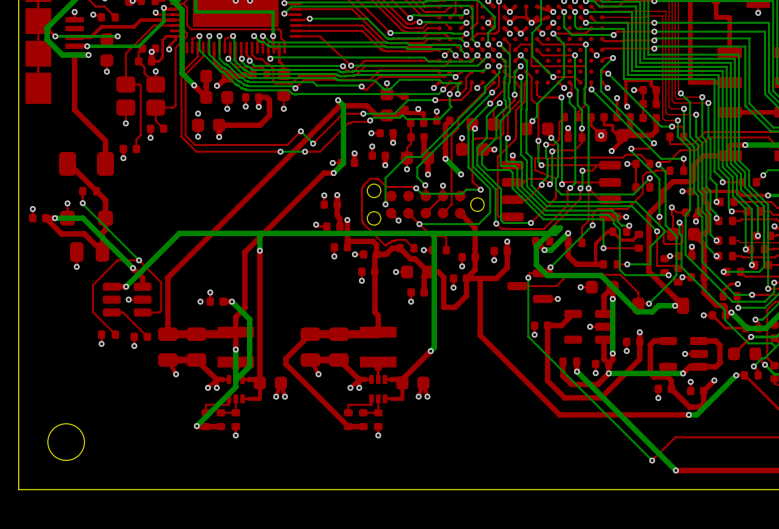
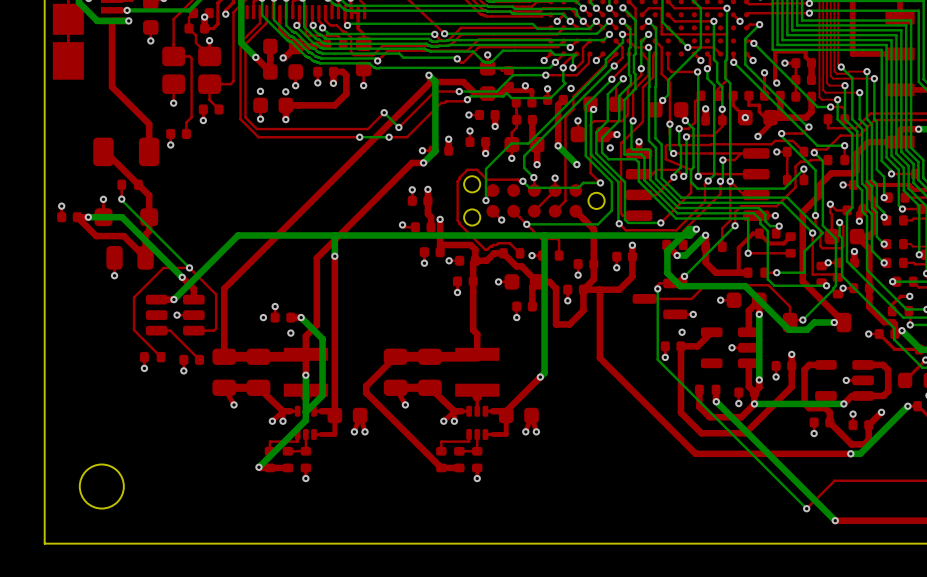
via: none -> (571, 88)
via: none -> (285, 91)
via: none -> (610, 147)
via: none -> (696, 229)
via: none -> (682, 332)
via: none -> (290, 333)

